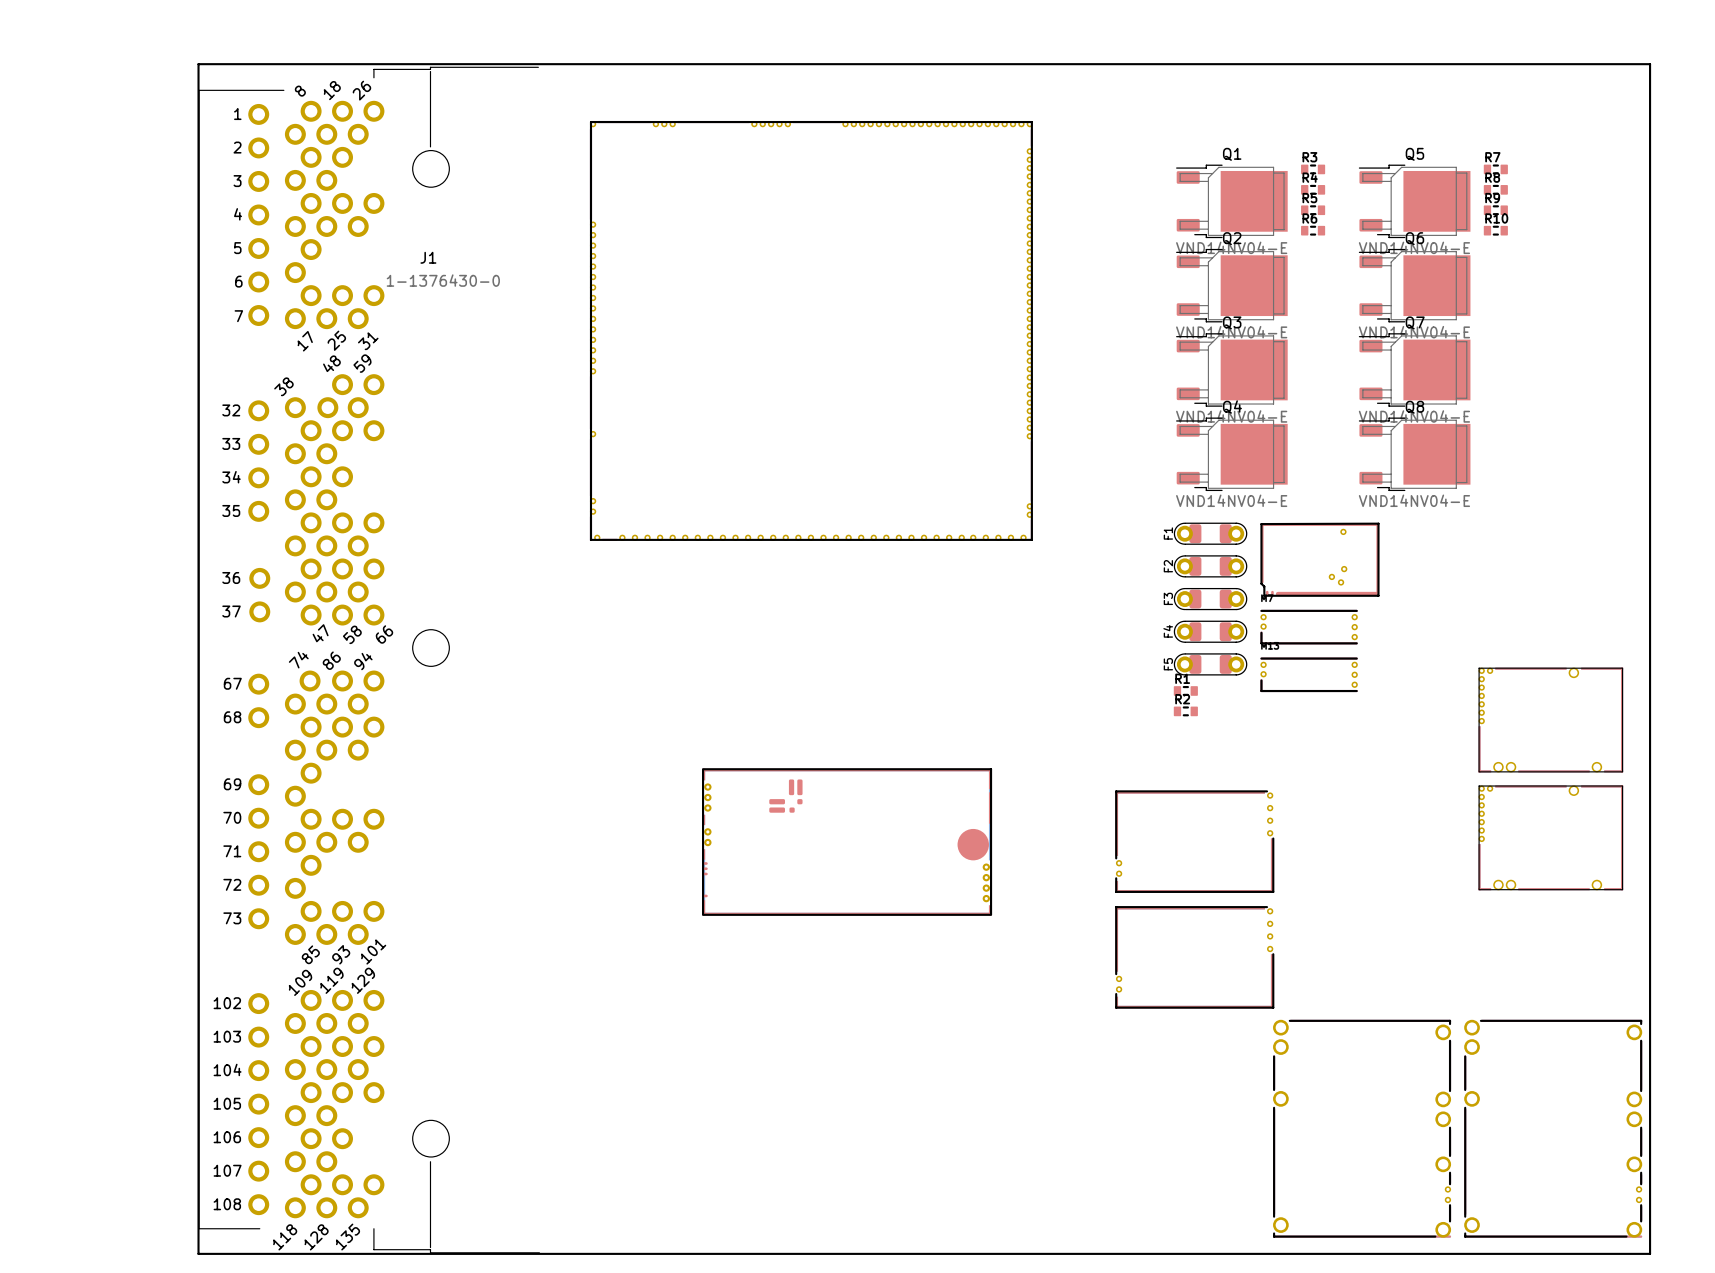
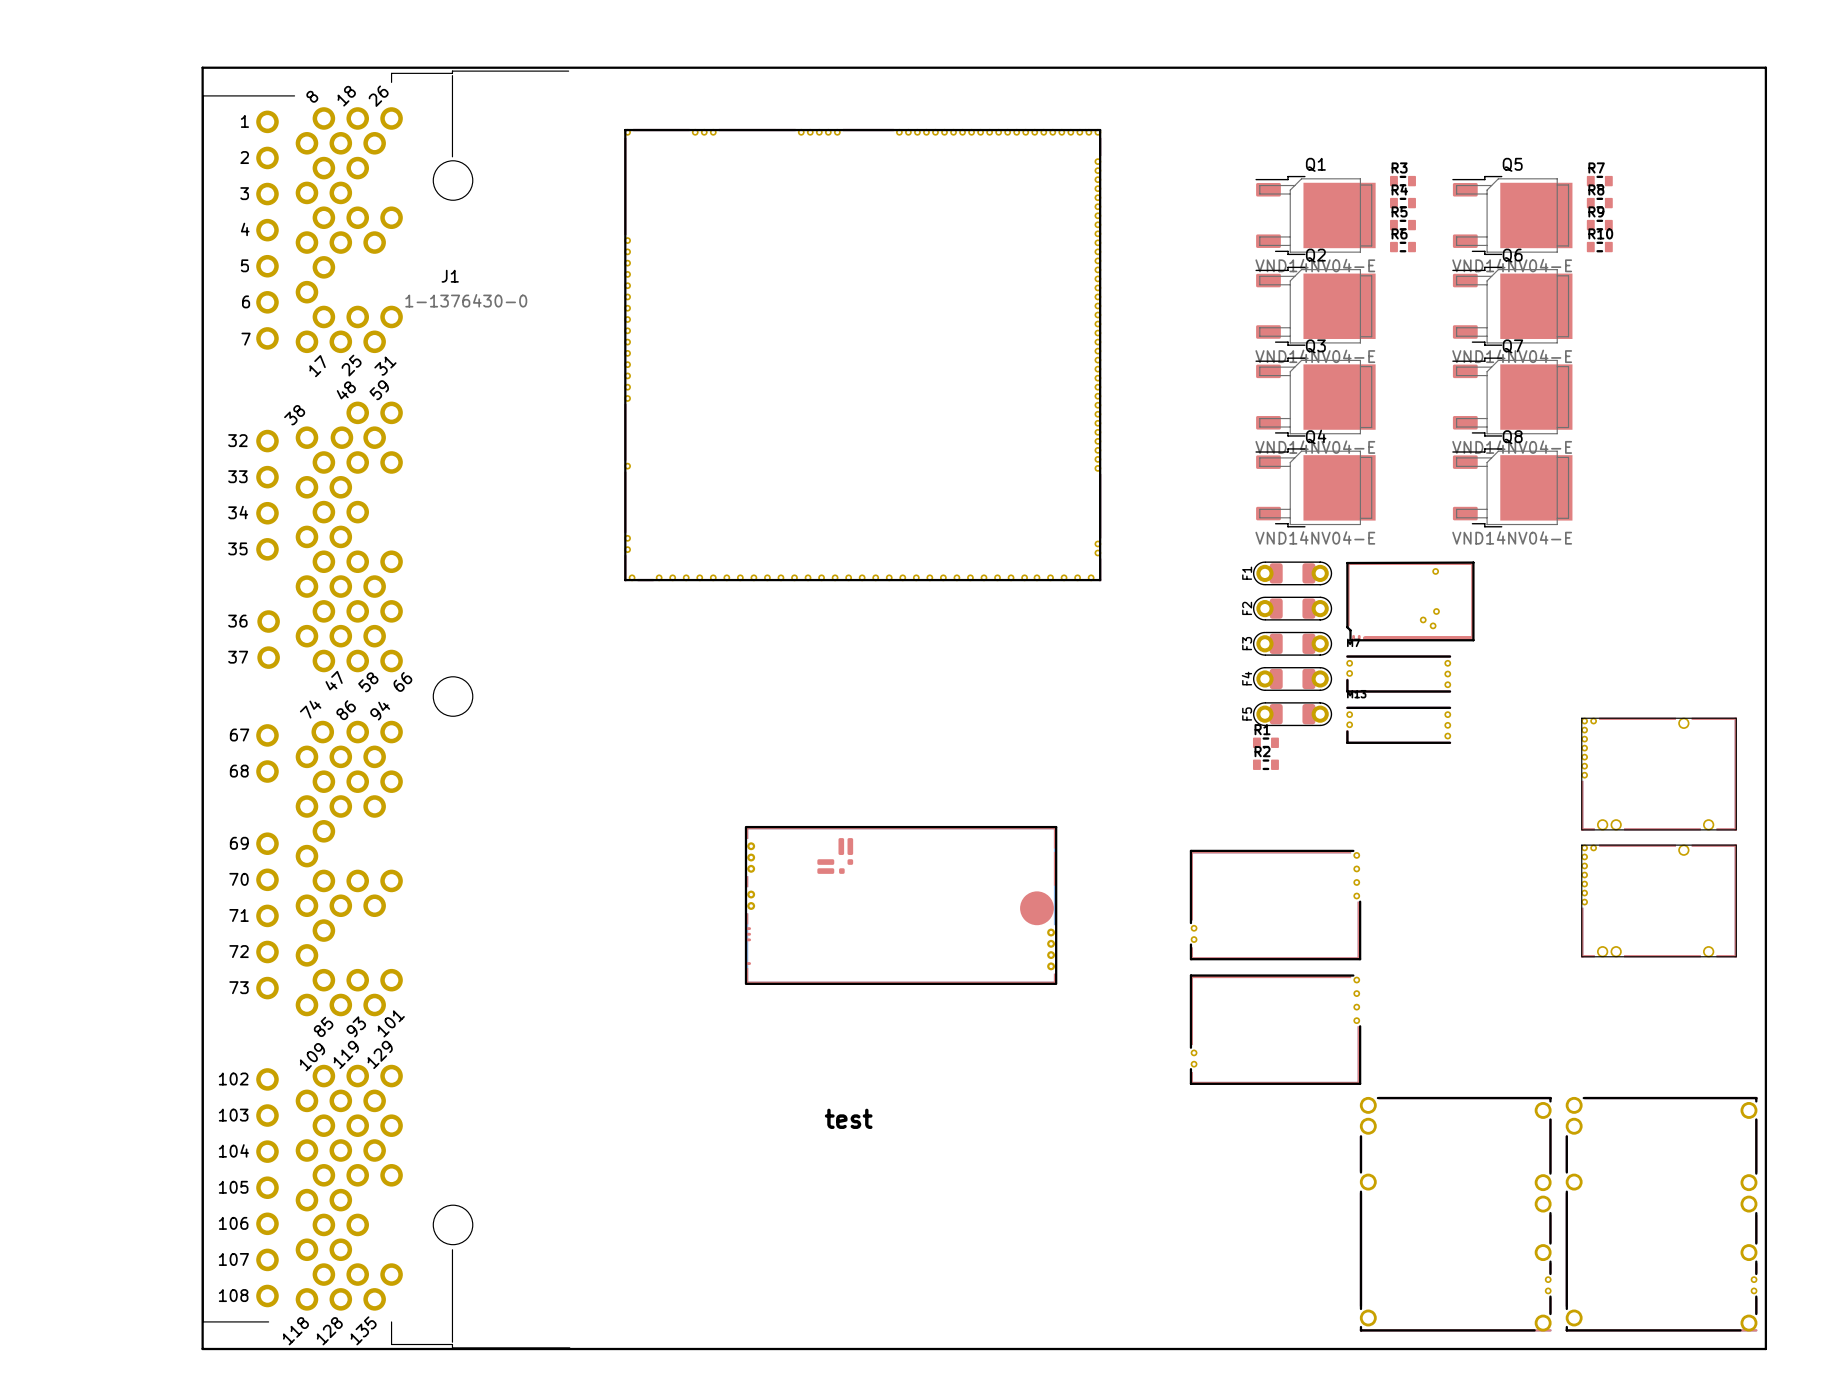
text: none -> test (848, 1118)

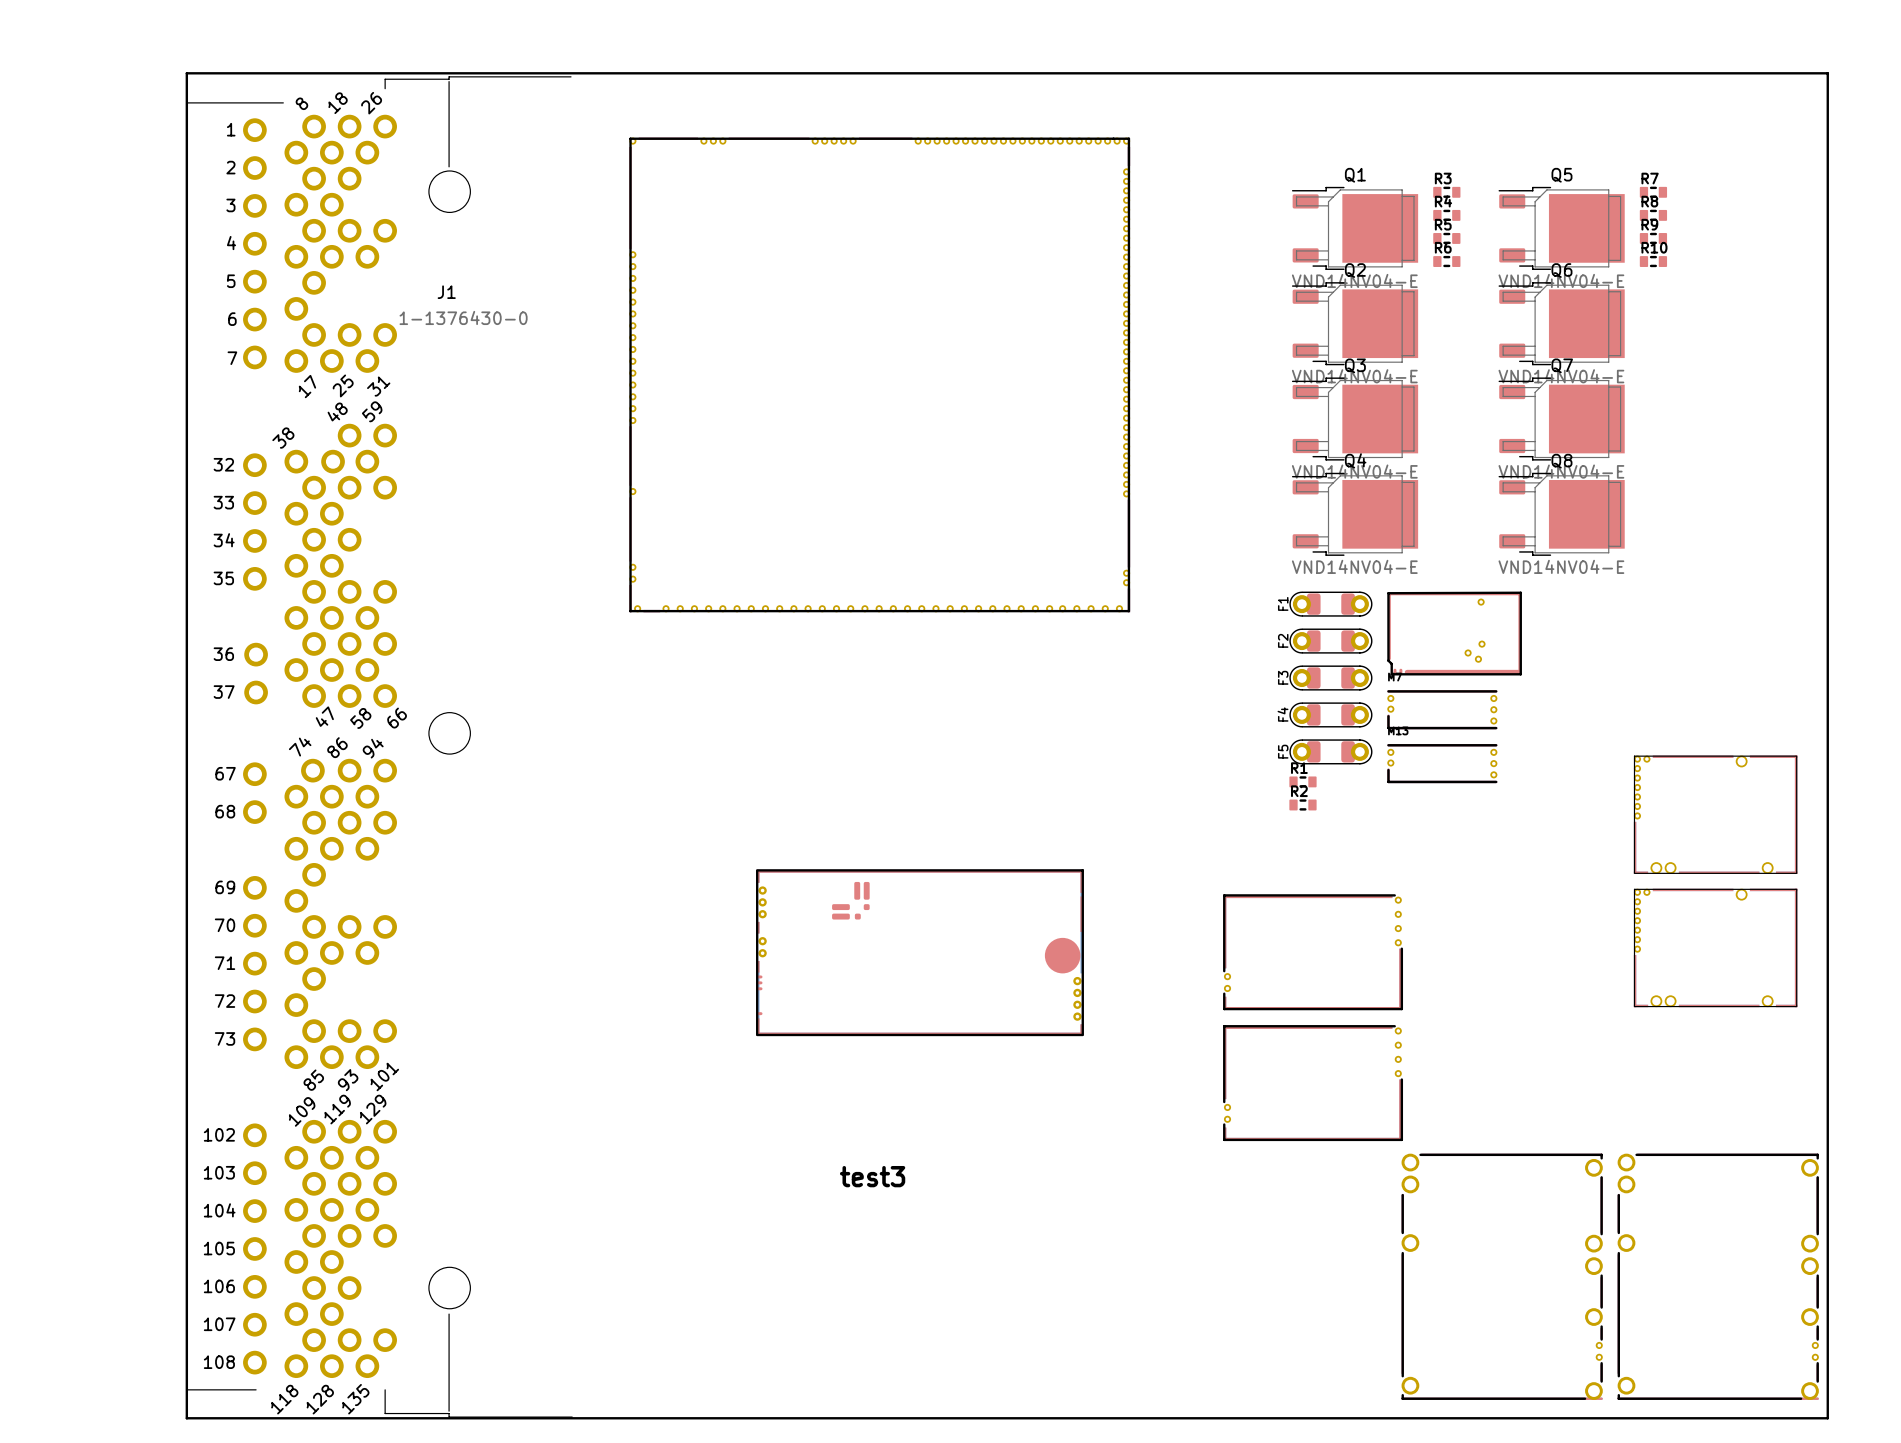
text: test (848, 1118) -> test3 (872, 1176)

